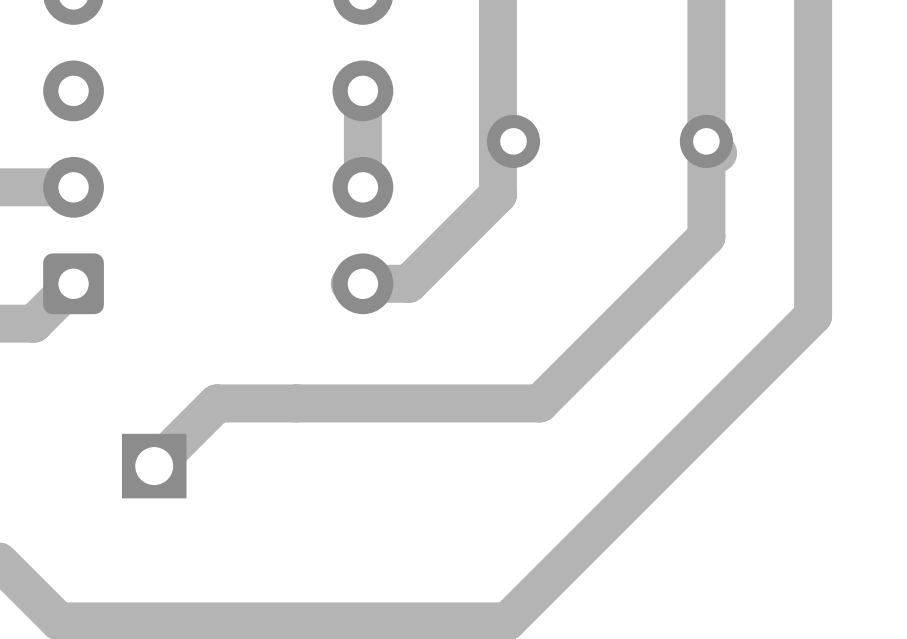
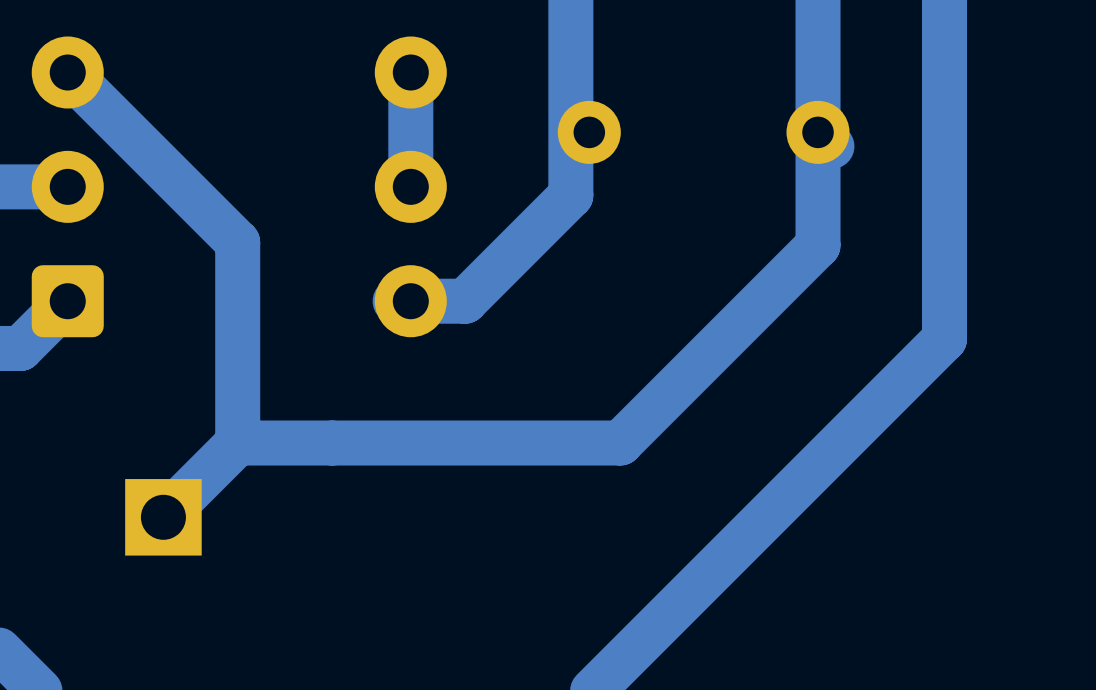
track: none -> (67, 72) (237, 242) (237, 443)

